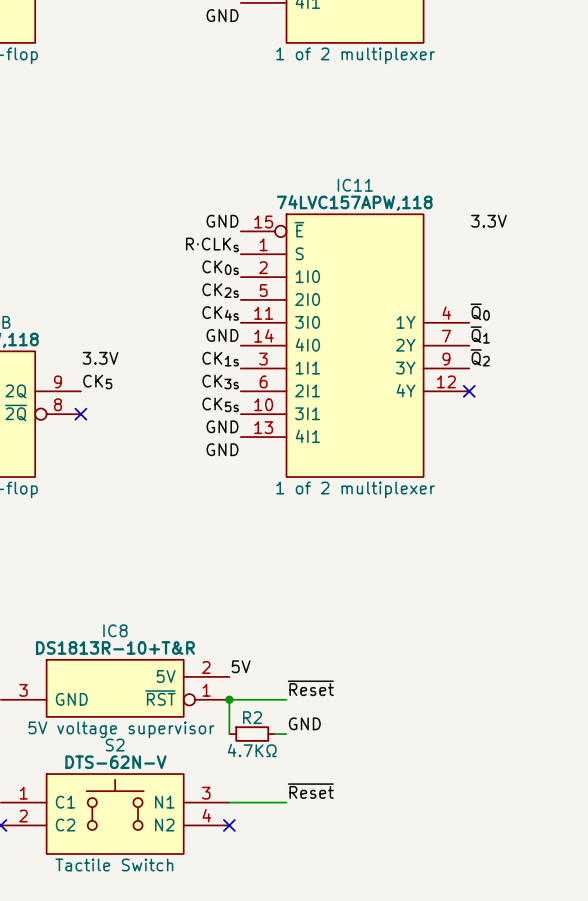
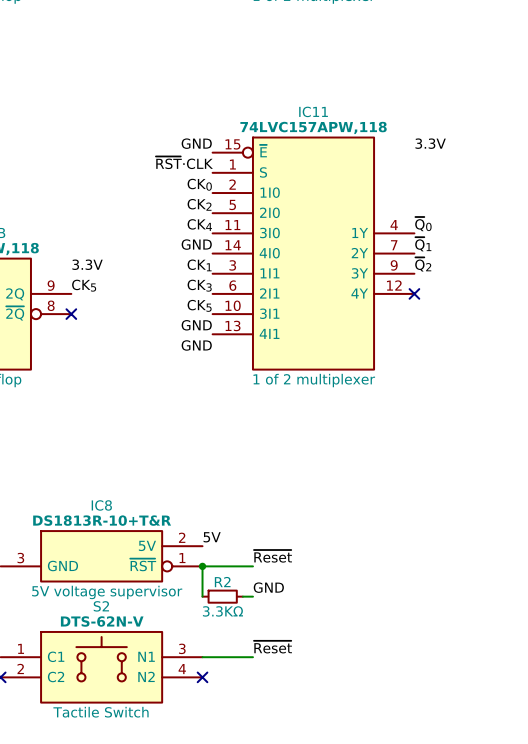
label: R⋅CLKs (212, 244) -> ~{RST}⋅CLK (184, 162)
label: CK0s (220, 267) -> CK0 (199, 184)
label: CK2s (220, 290) -> CK2 (199, 204)
label: CK4s (220, 313) -> CK4 (199, 225)
label: CK1s (220, 359) -> CK1 (199, 265)
label: CK3s (220, 382) -> CK3 (199, 285)
label: CK5s (220, 404) -> CK5 (199, 305)
R2 value: 4.7KΩ (252, 750) -> 3.3KΩ (222, 611)

